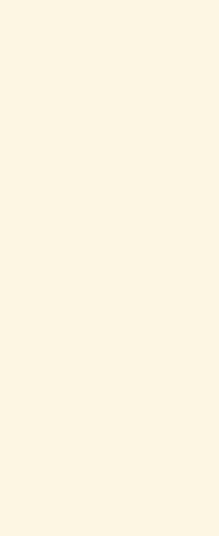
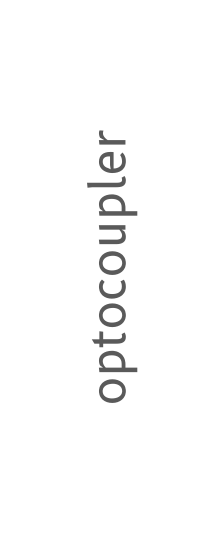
text: none -> optocoupler (112, 266)

